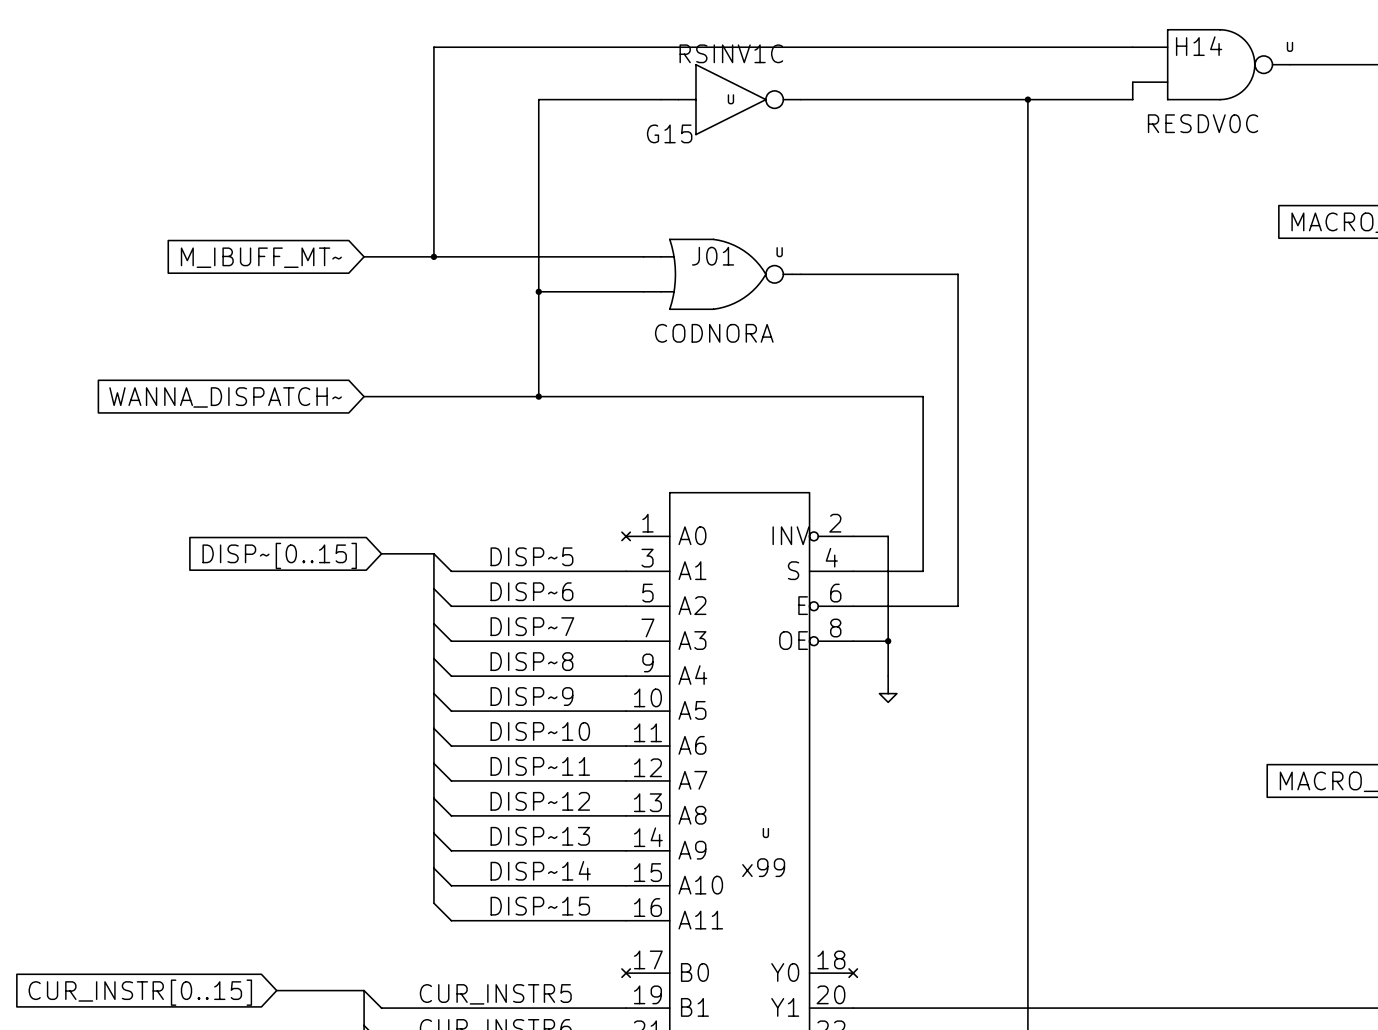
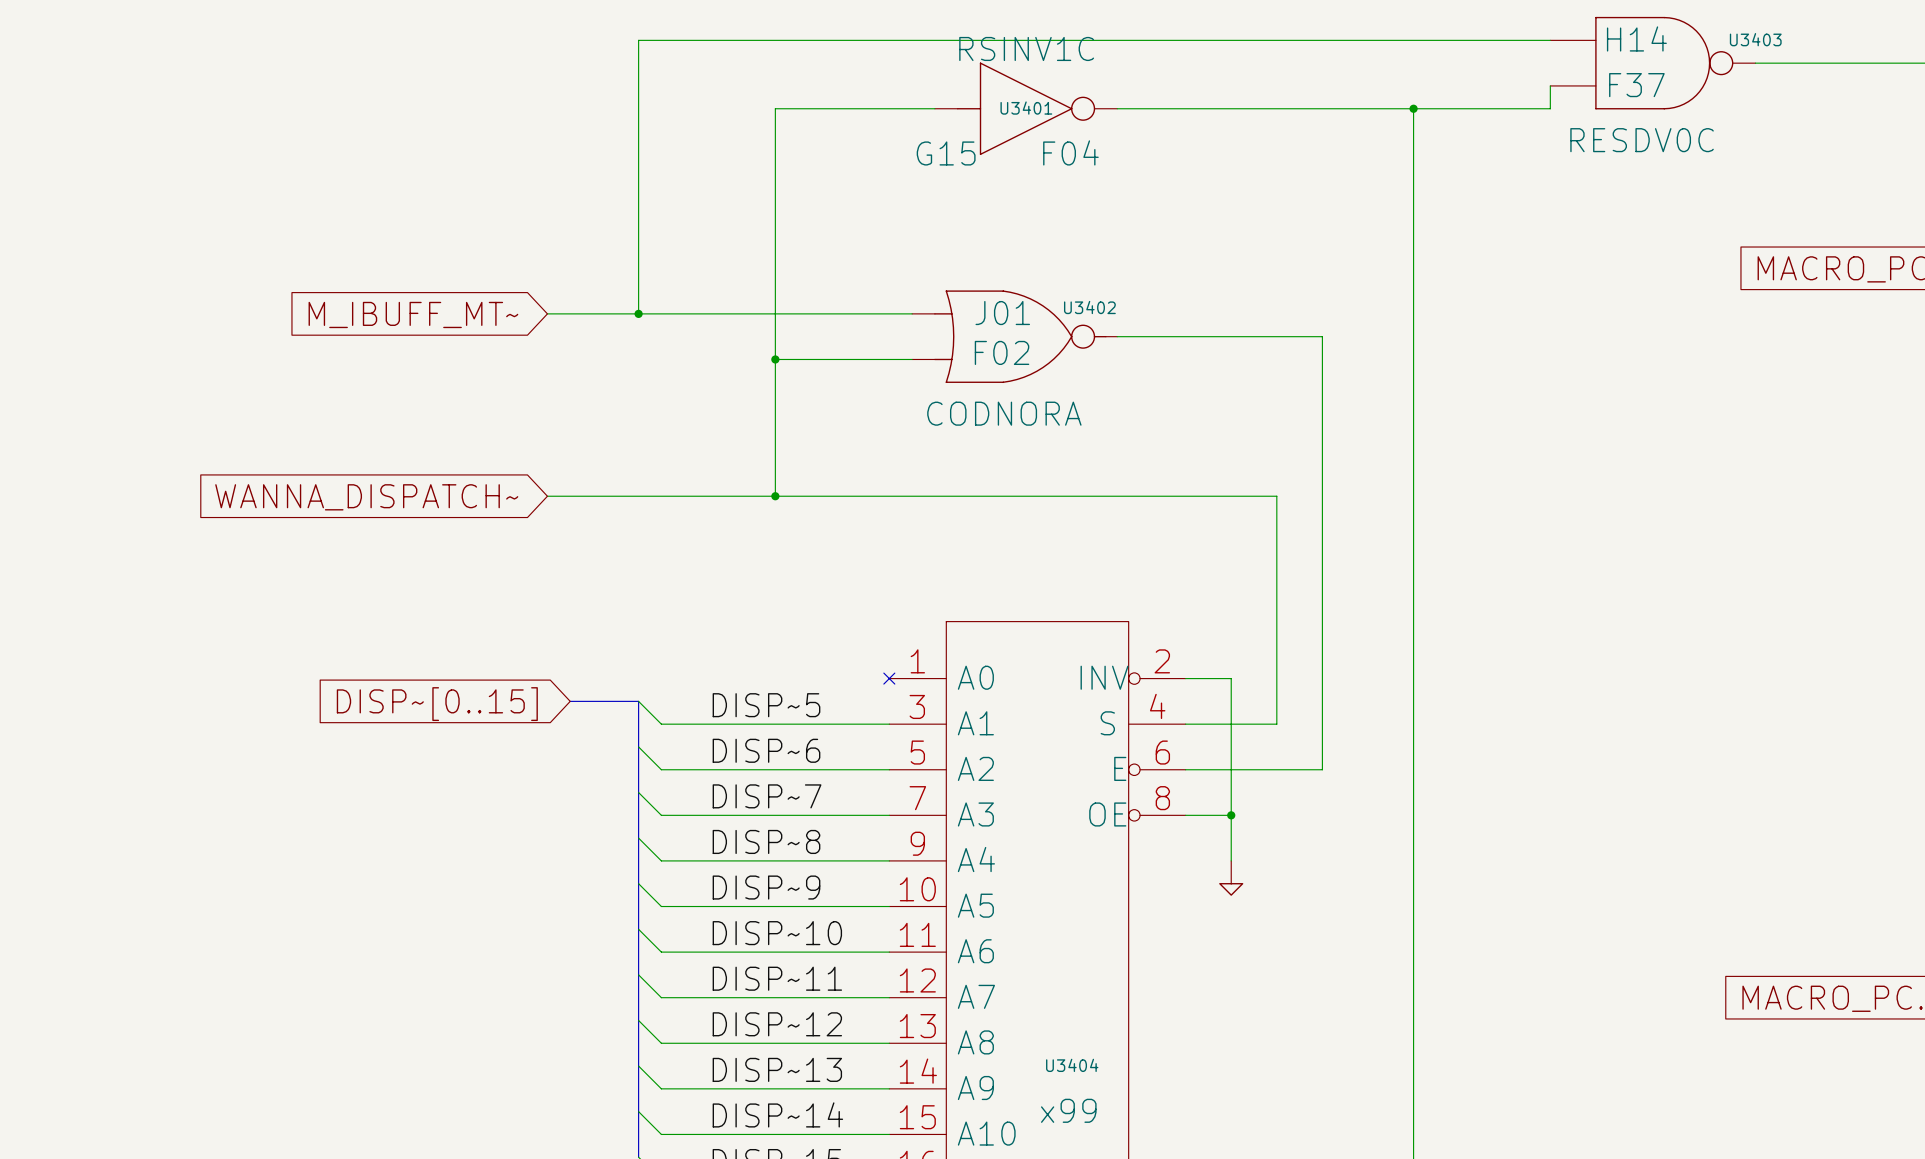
U name: U (1289, 46) -> U3403 (1755, 39)
U value: none -> F37 (1636, 85)
U name: U (730, 99) -> U3401 (1026, 108)
U value: none -> F04 (1070, 152)
U name: U (779, 252) -> U3402 (1089, 307)
U value: none -> F02 (1002, 352)
U name: U (765, 833) -> U3404 (1072, 1065)

